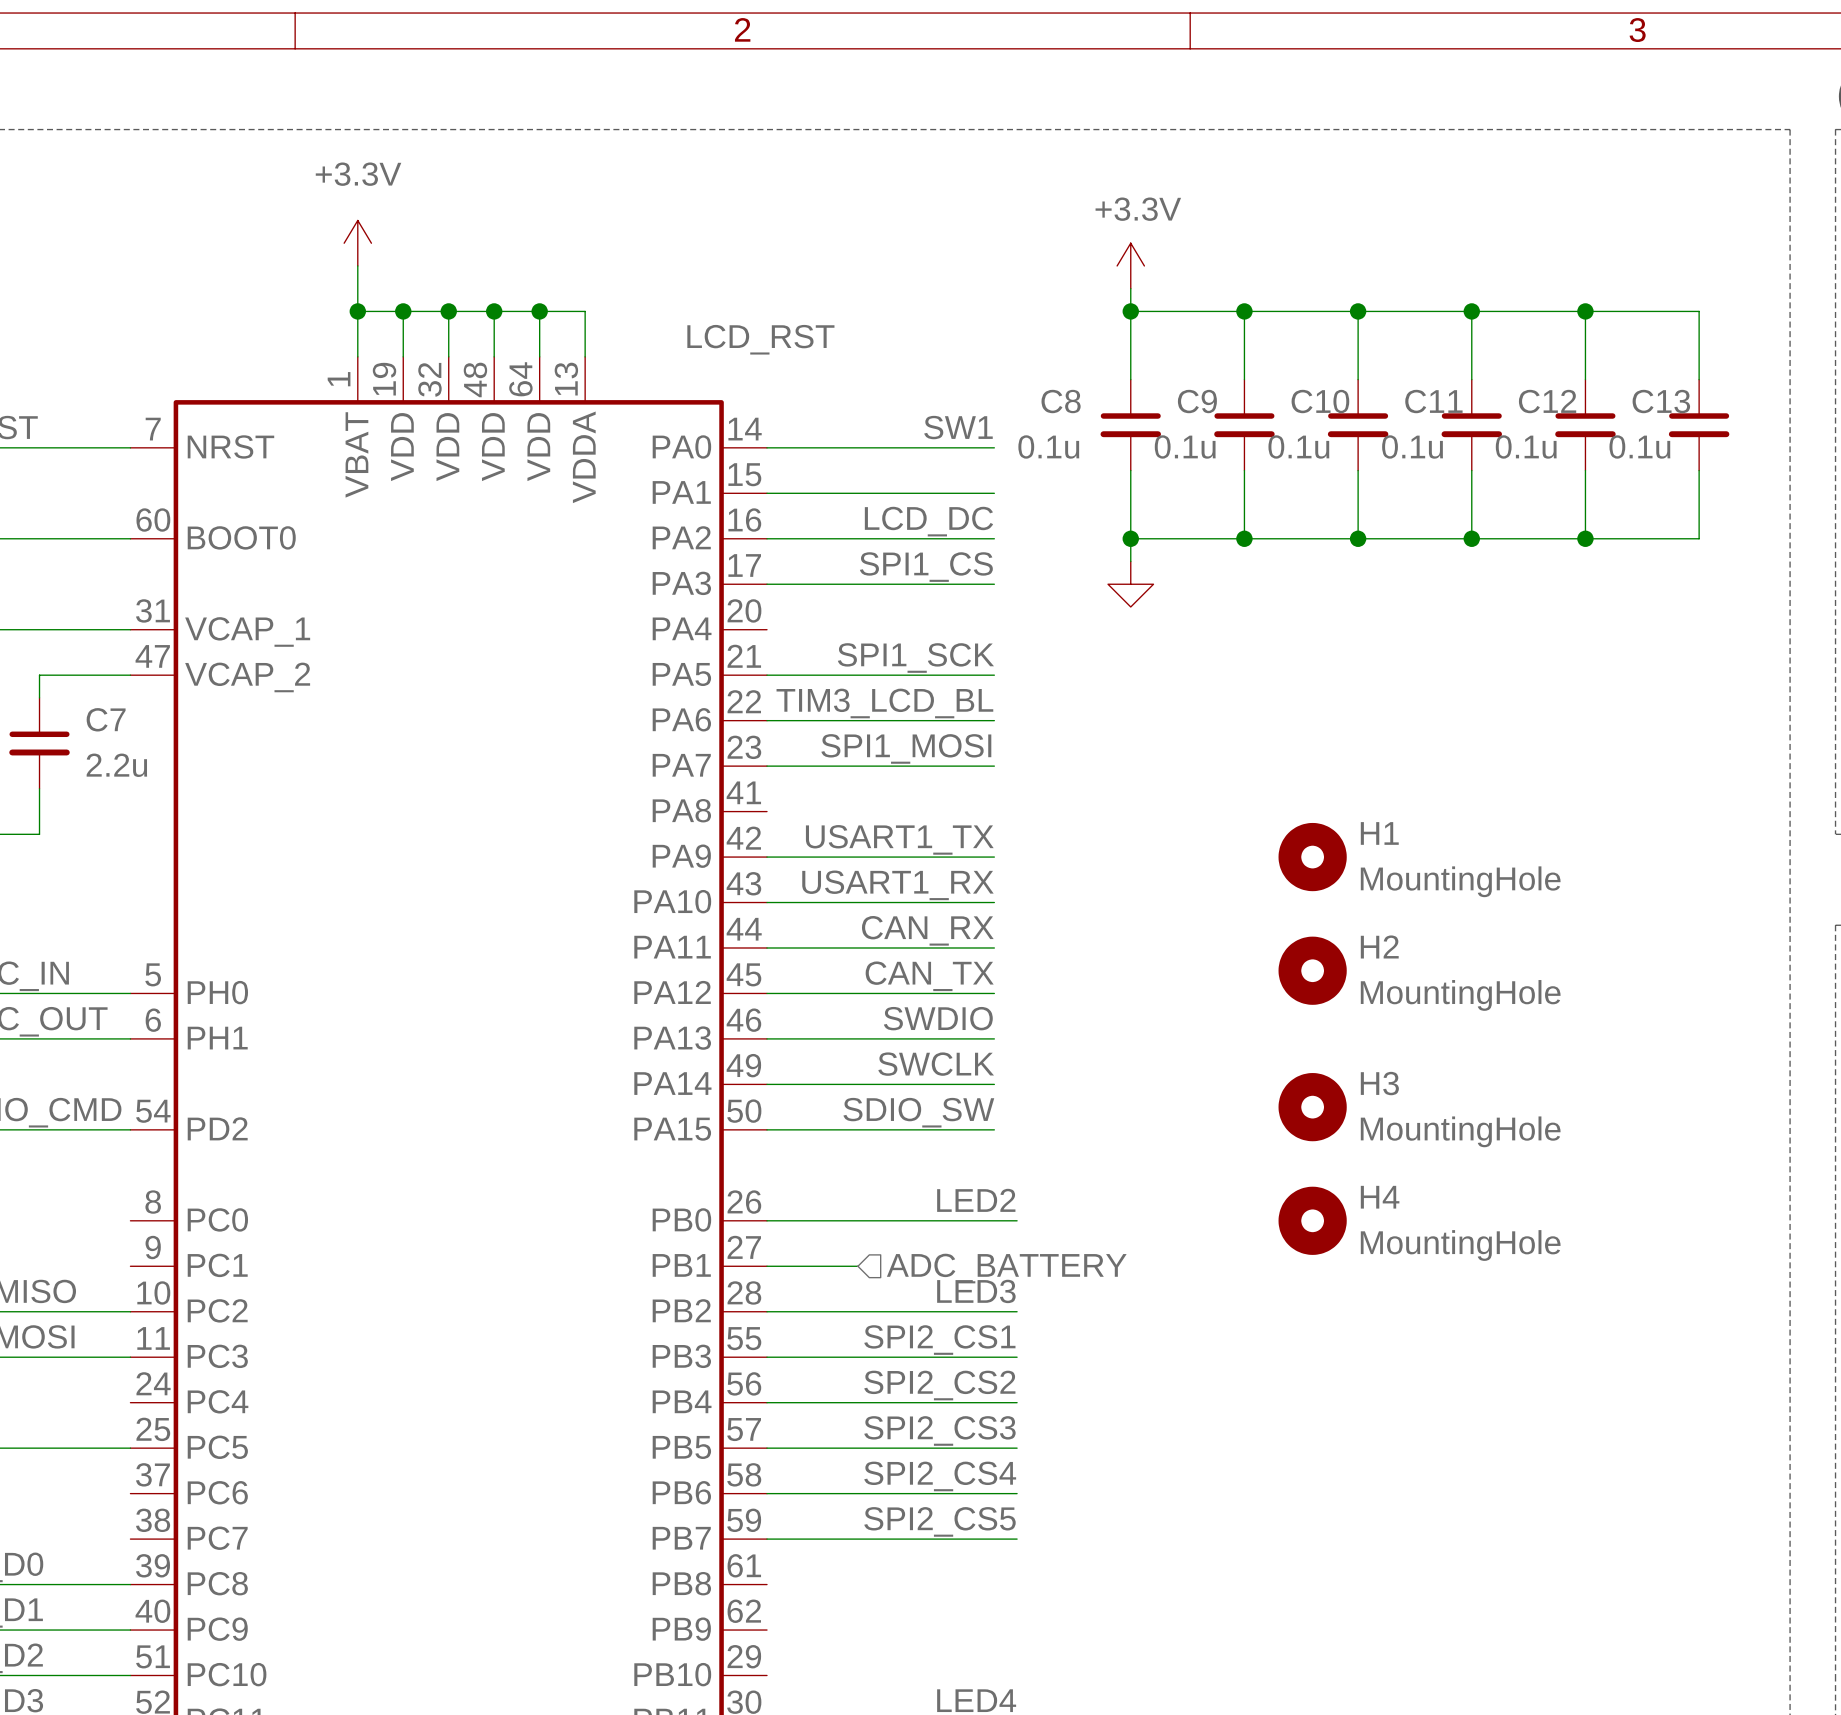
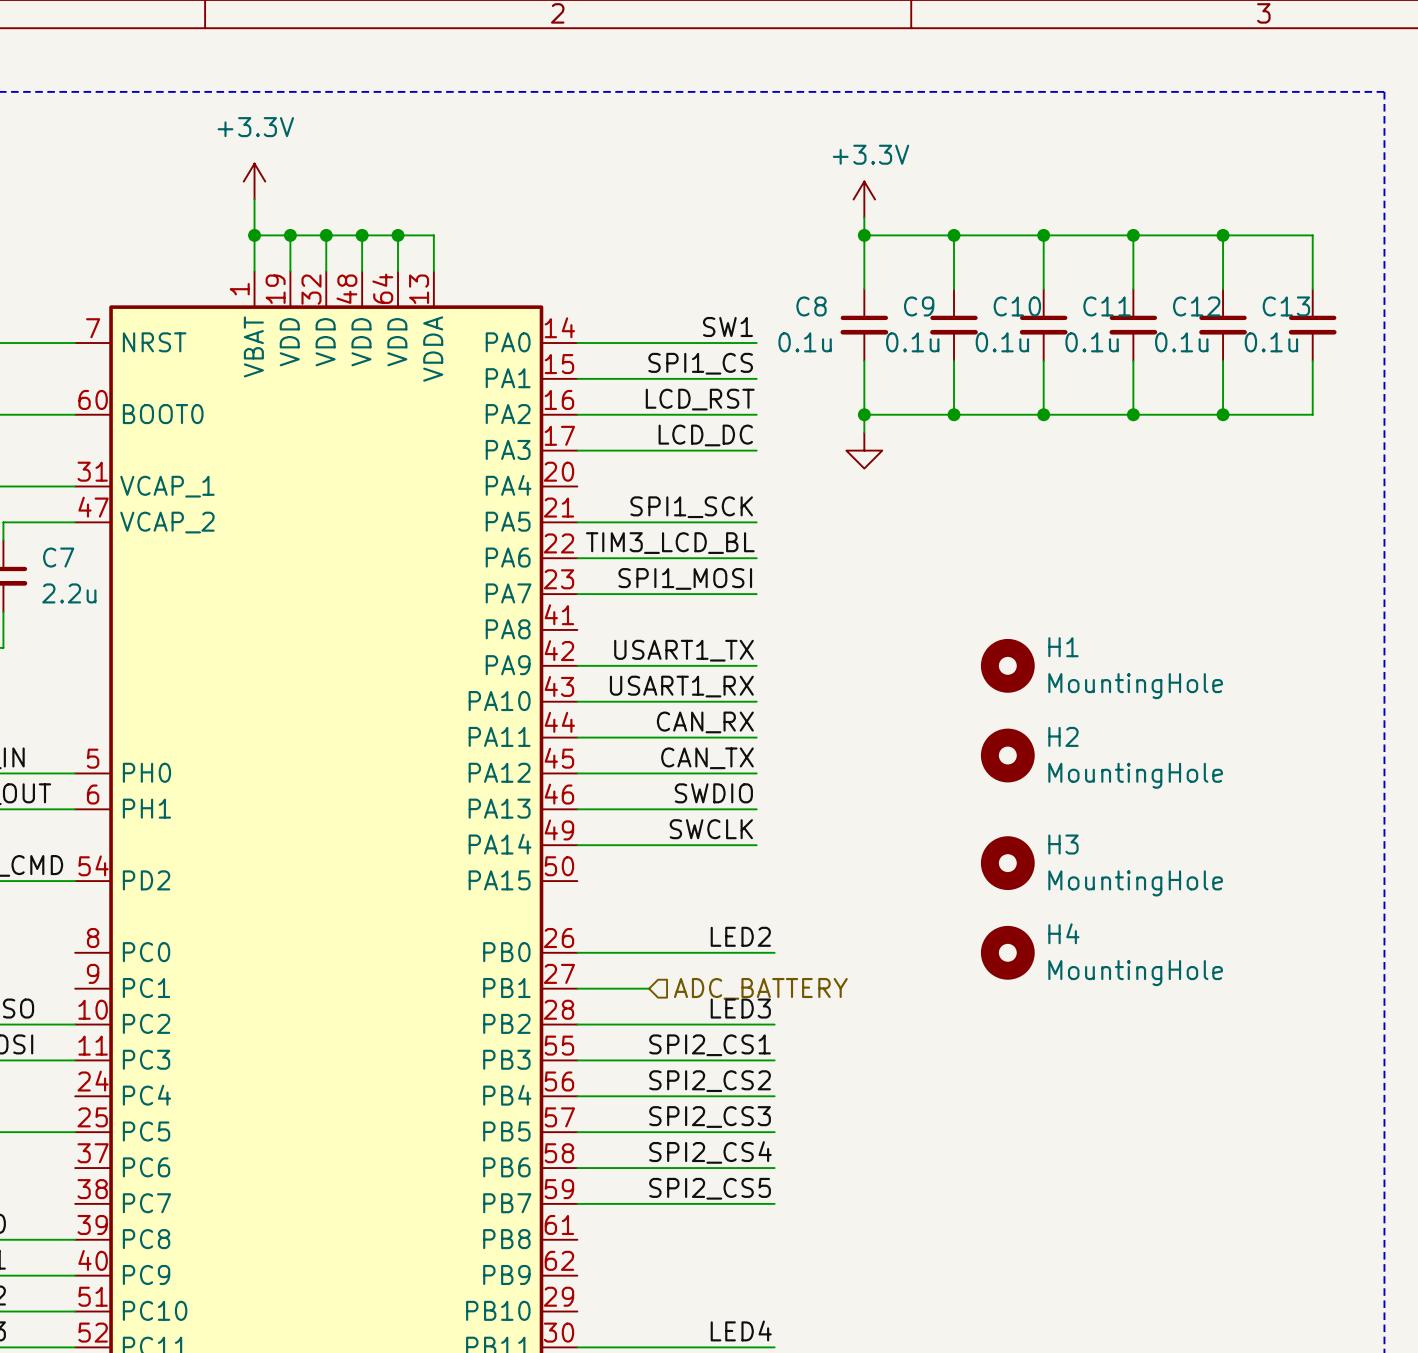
label: LCD_RST (760, 339) -> none
label: none -> SPI1_CS (700, 363)
label: LCD_DC (928, 521) -> LCD_RST (700, 399)
label: SPI1_CS (926, 567) -> LCD_DC (705, 435)
label: SDIO_SW (918, 1112) -> none
wire: (767, 1129) (994, 1129) -> none

